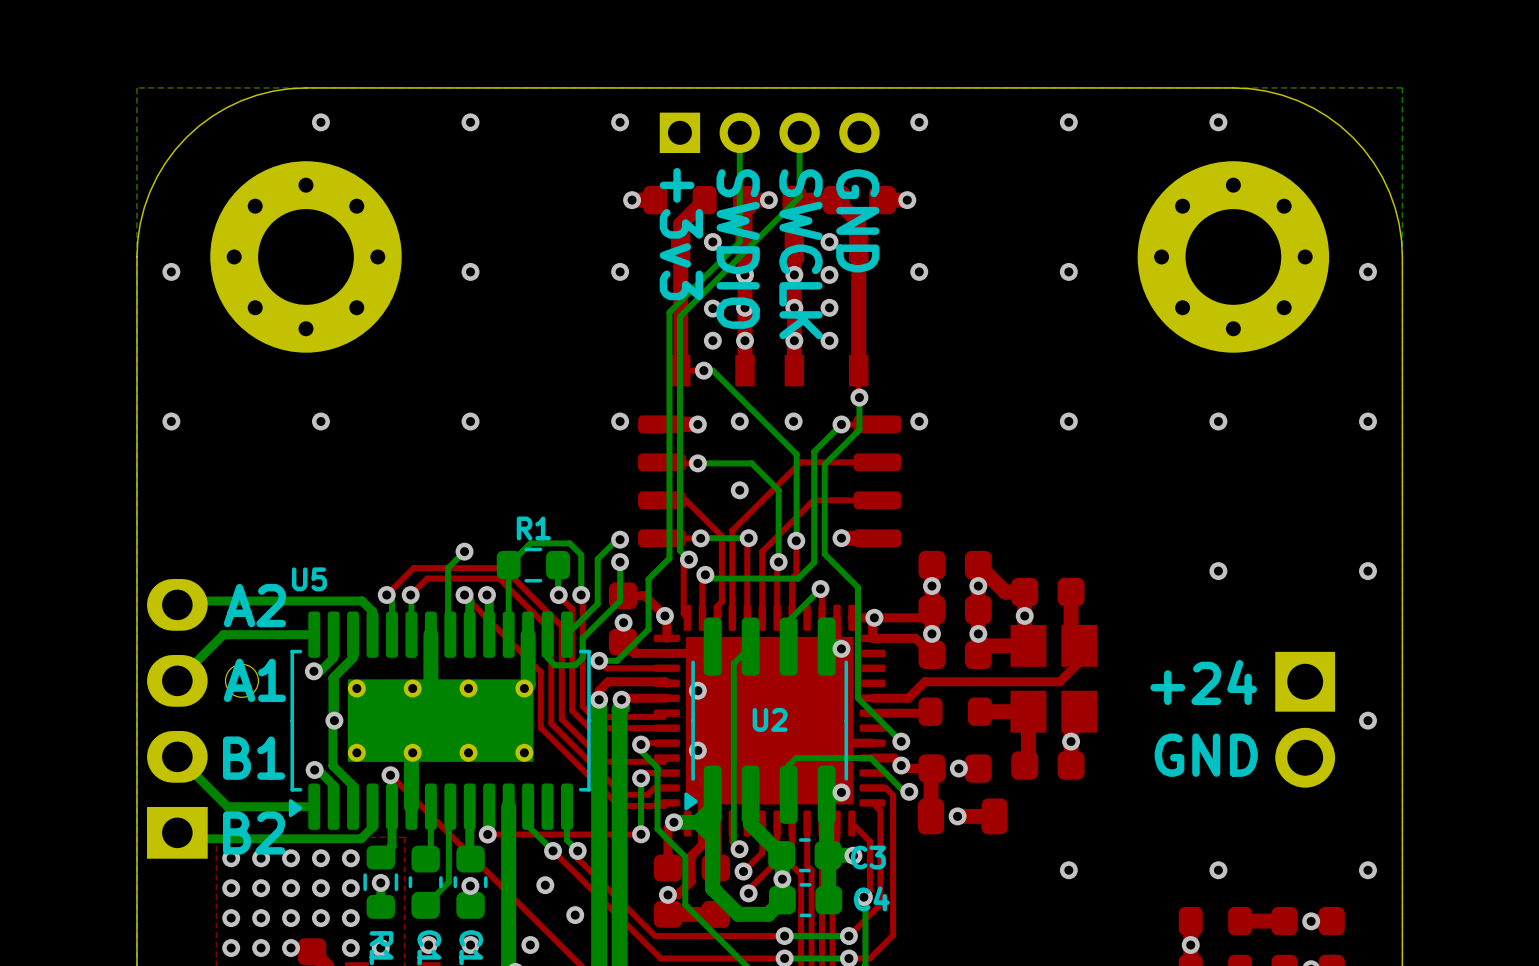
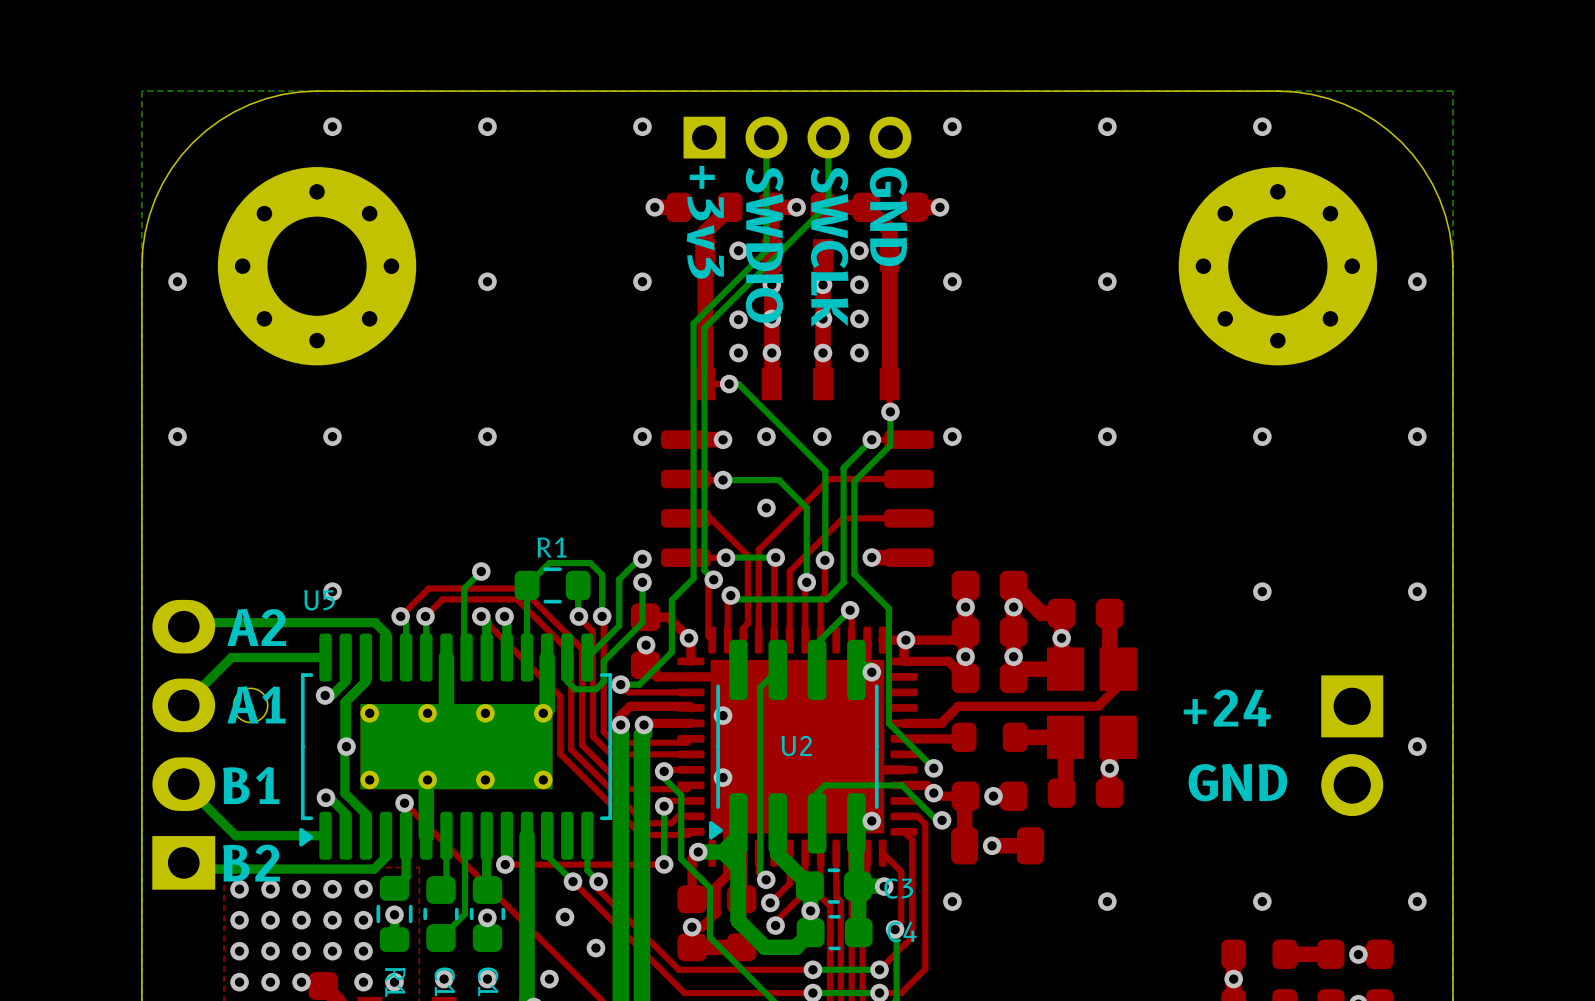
via: none -> (332, 591)
via: none -> (952, 901)

